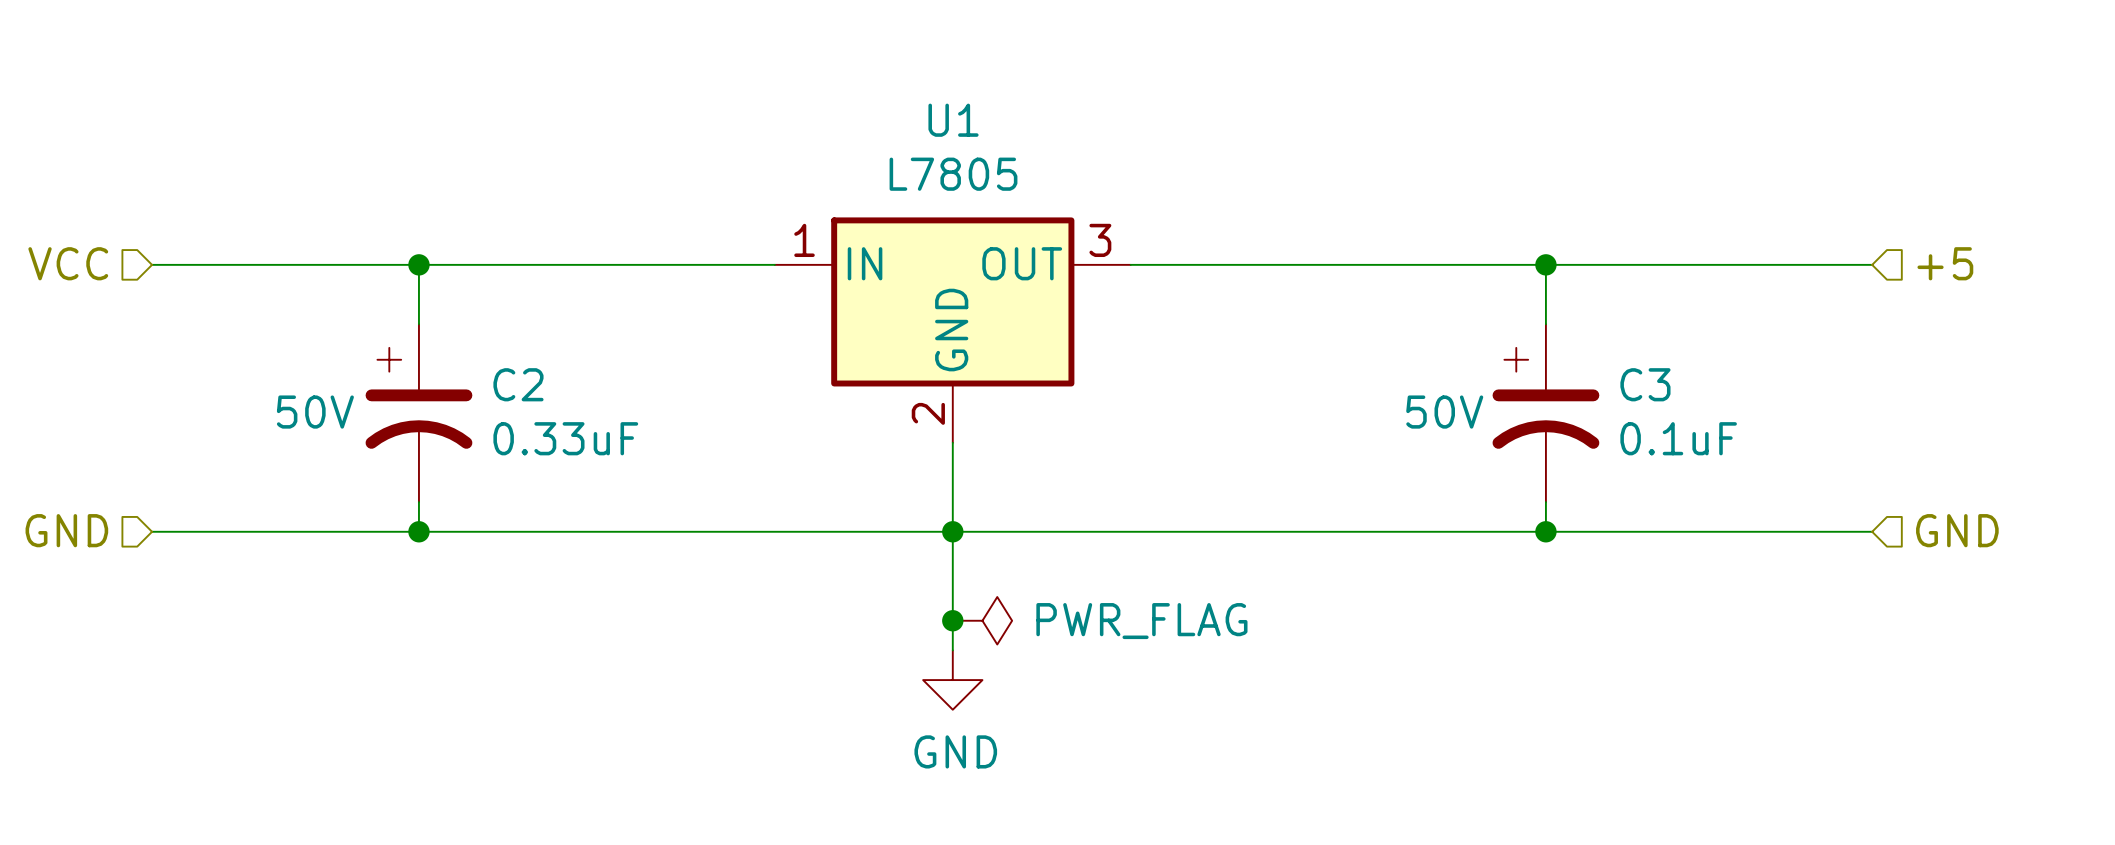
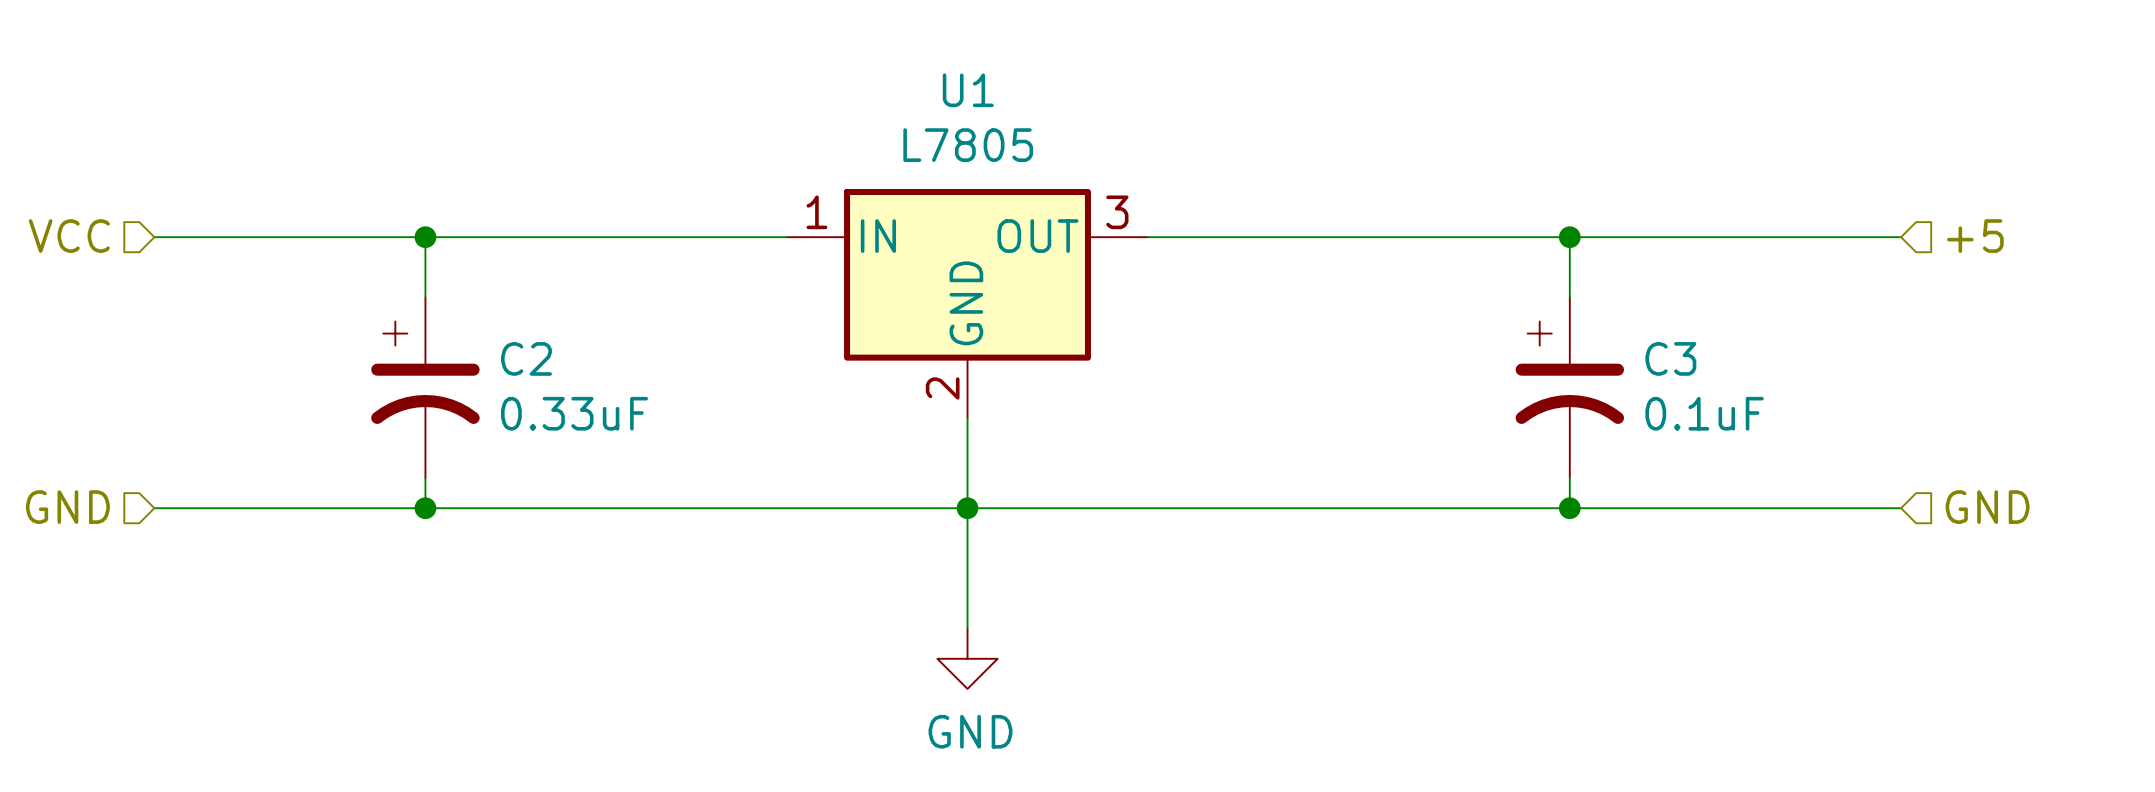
C2 text: 50V (315, 412) -> none
C3 text: 50V (1444, 412) -> none
junction: (952, 620) -> none
power symbol: PWR_FLAG (982, 620) -> none

